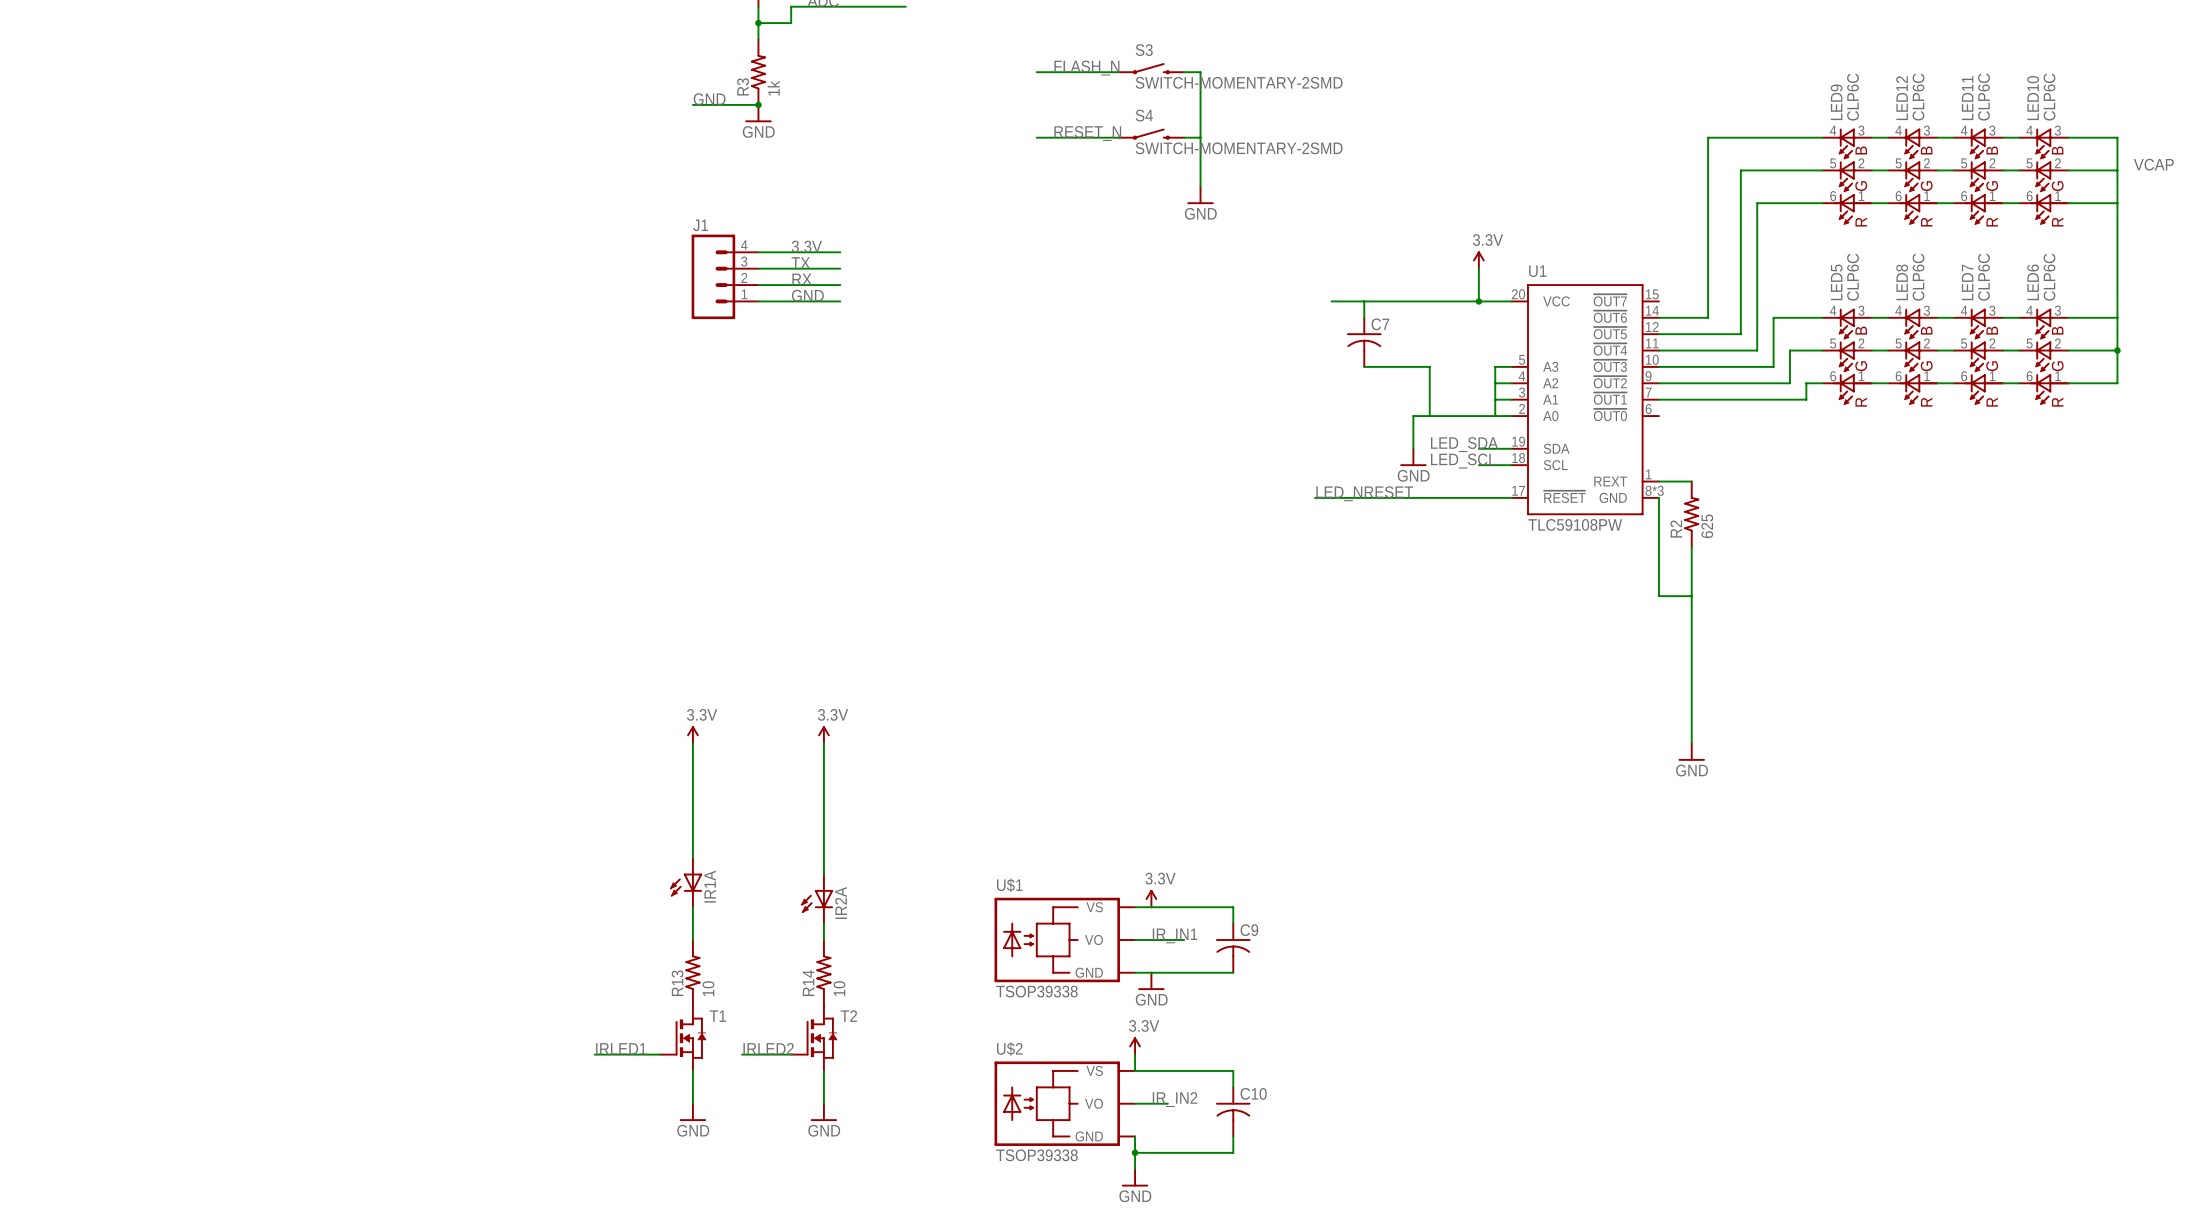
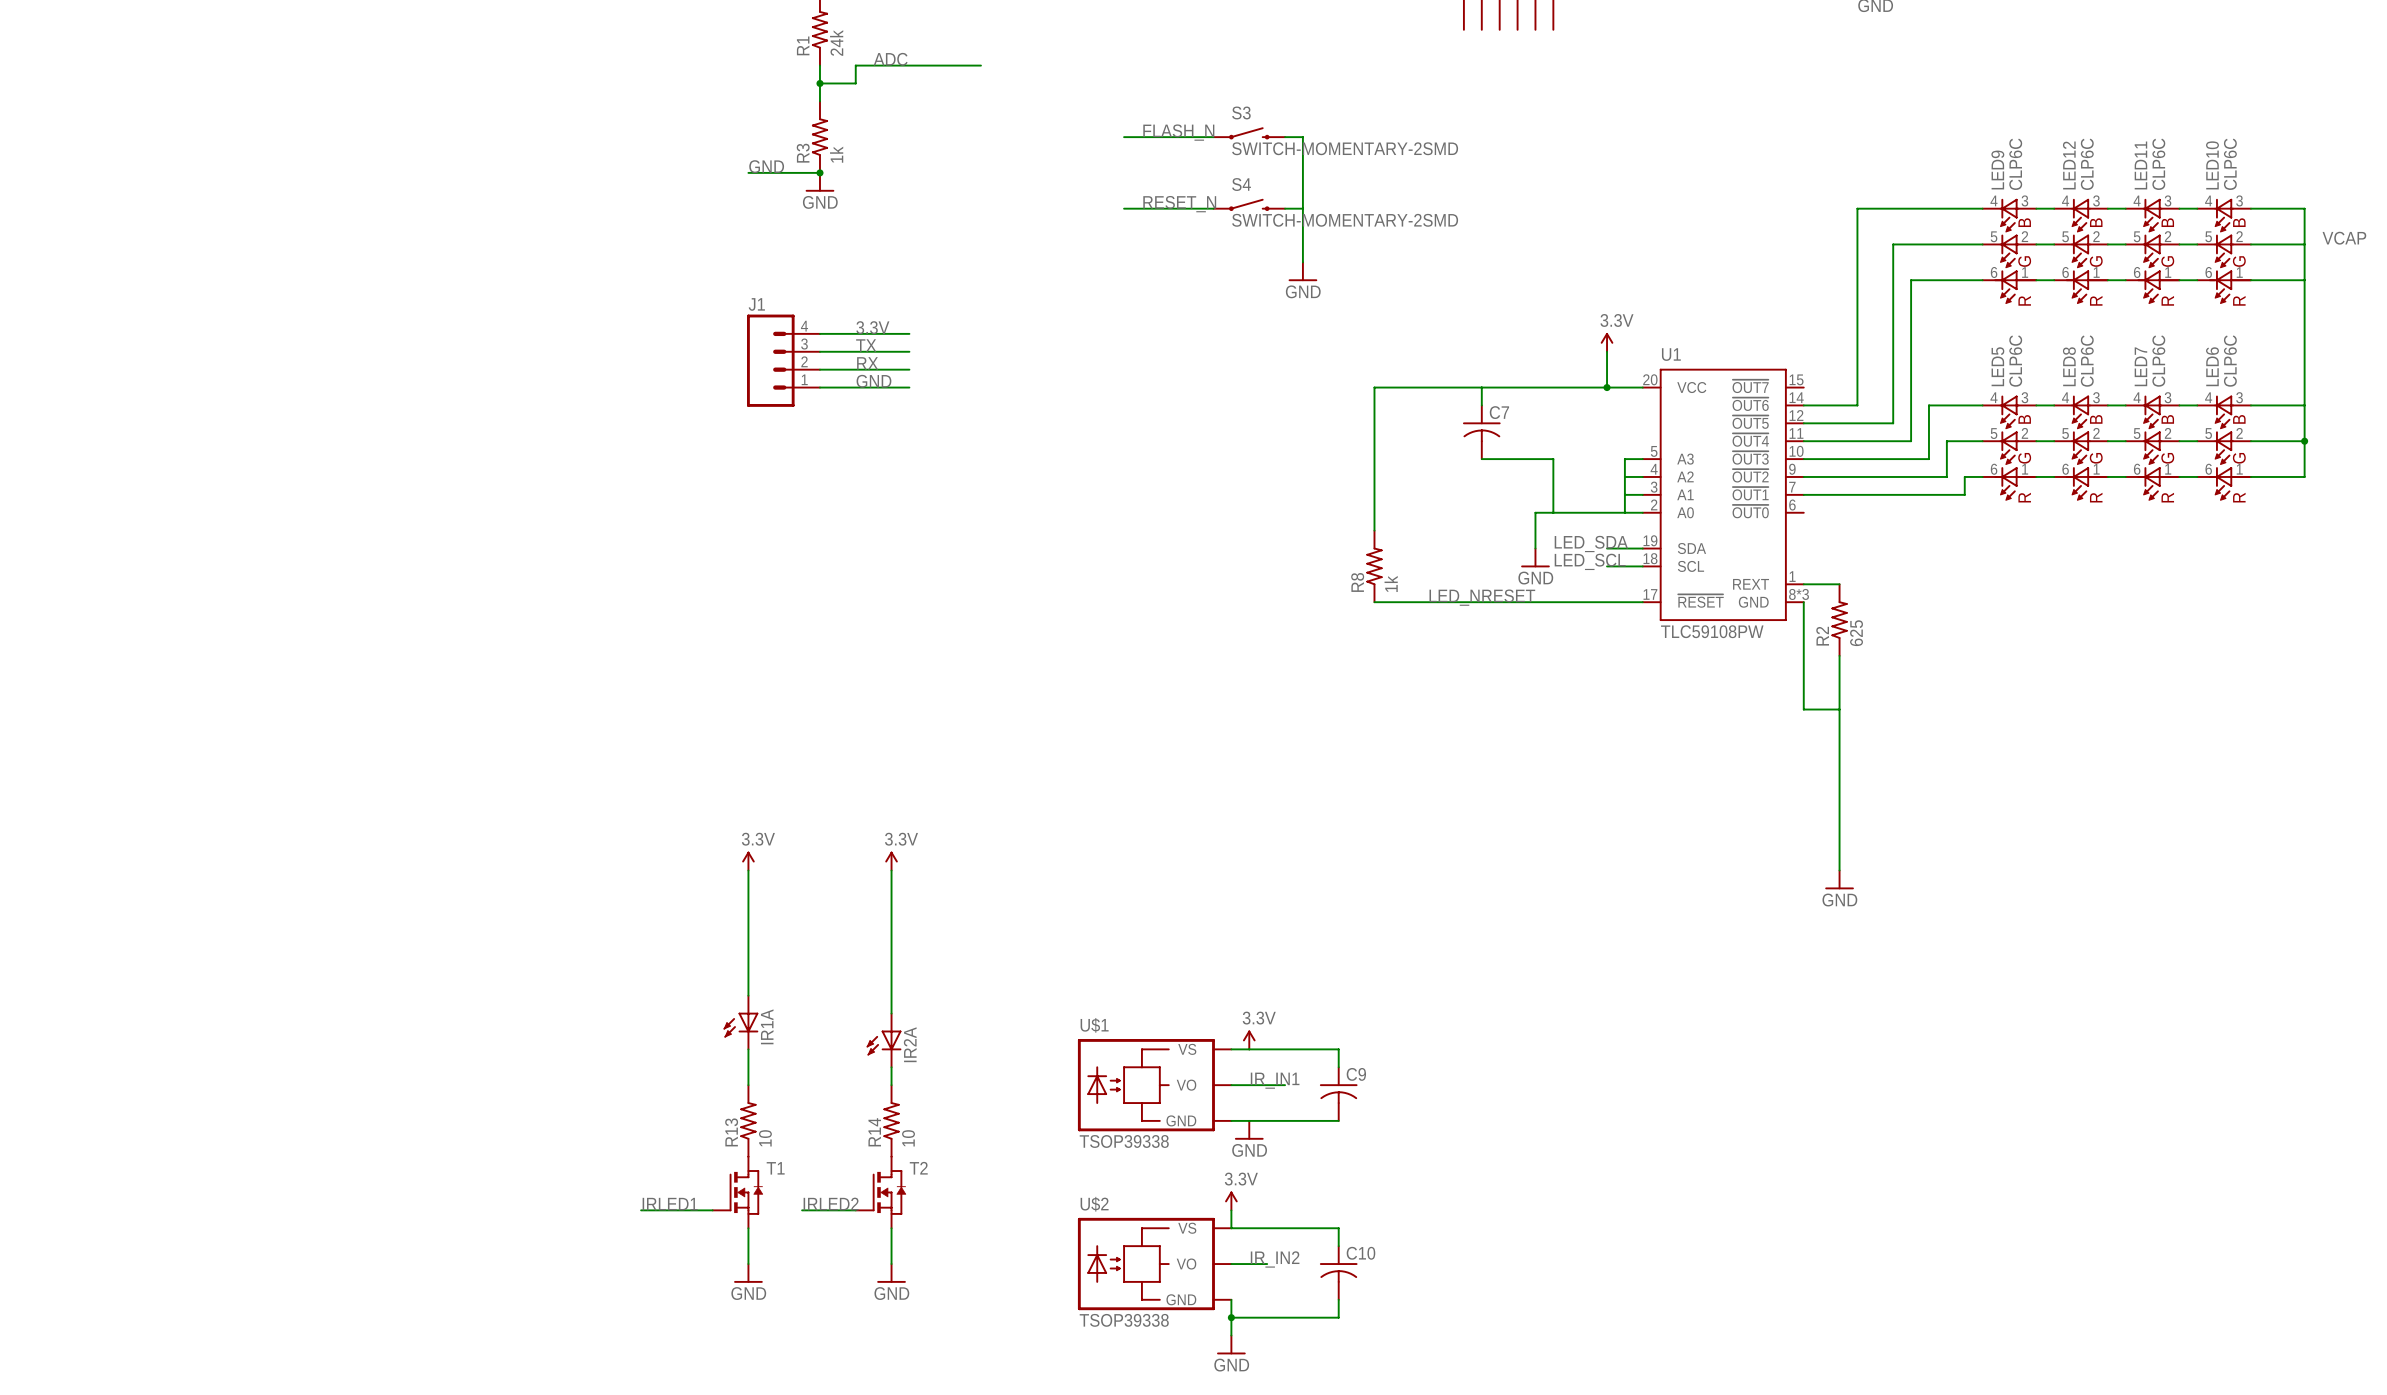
wire: none -> (1446, 387) (1374, 387) (1374, 530)
R8: none -> 1k (1374, 566)
wire: none -> (1374, 602) (1428, 602)

